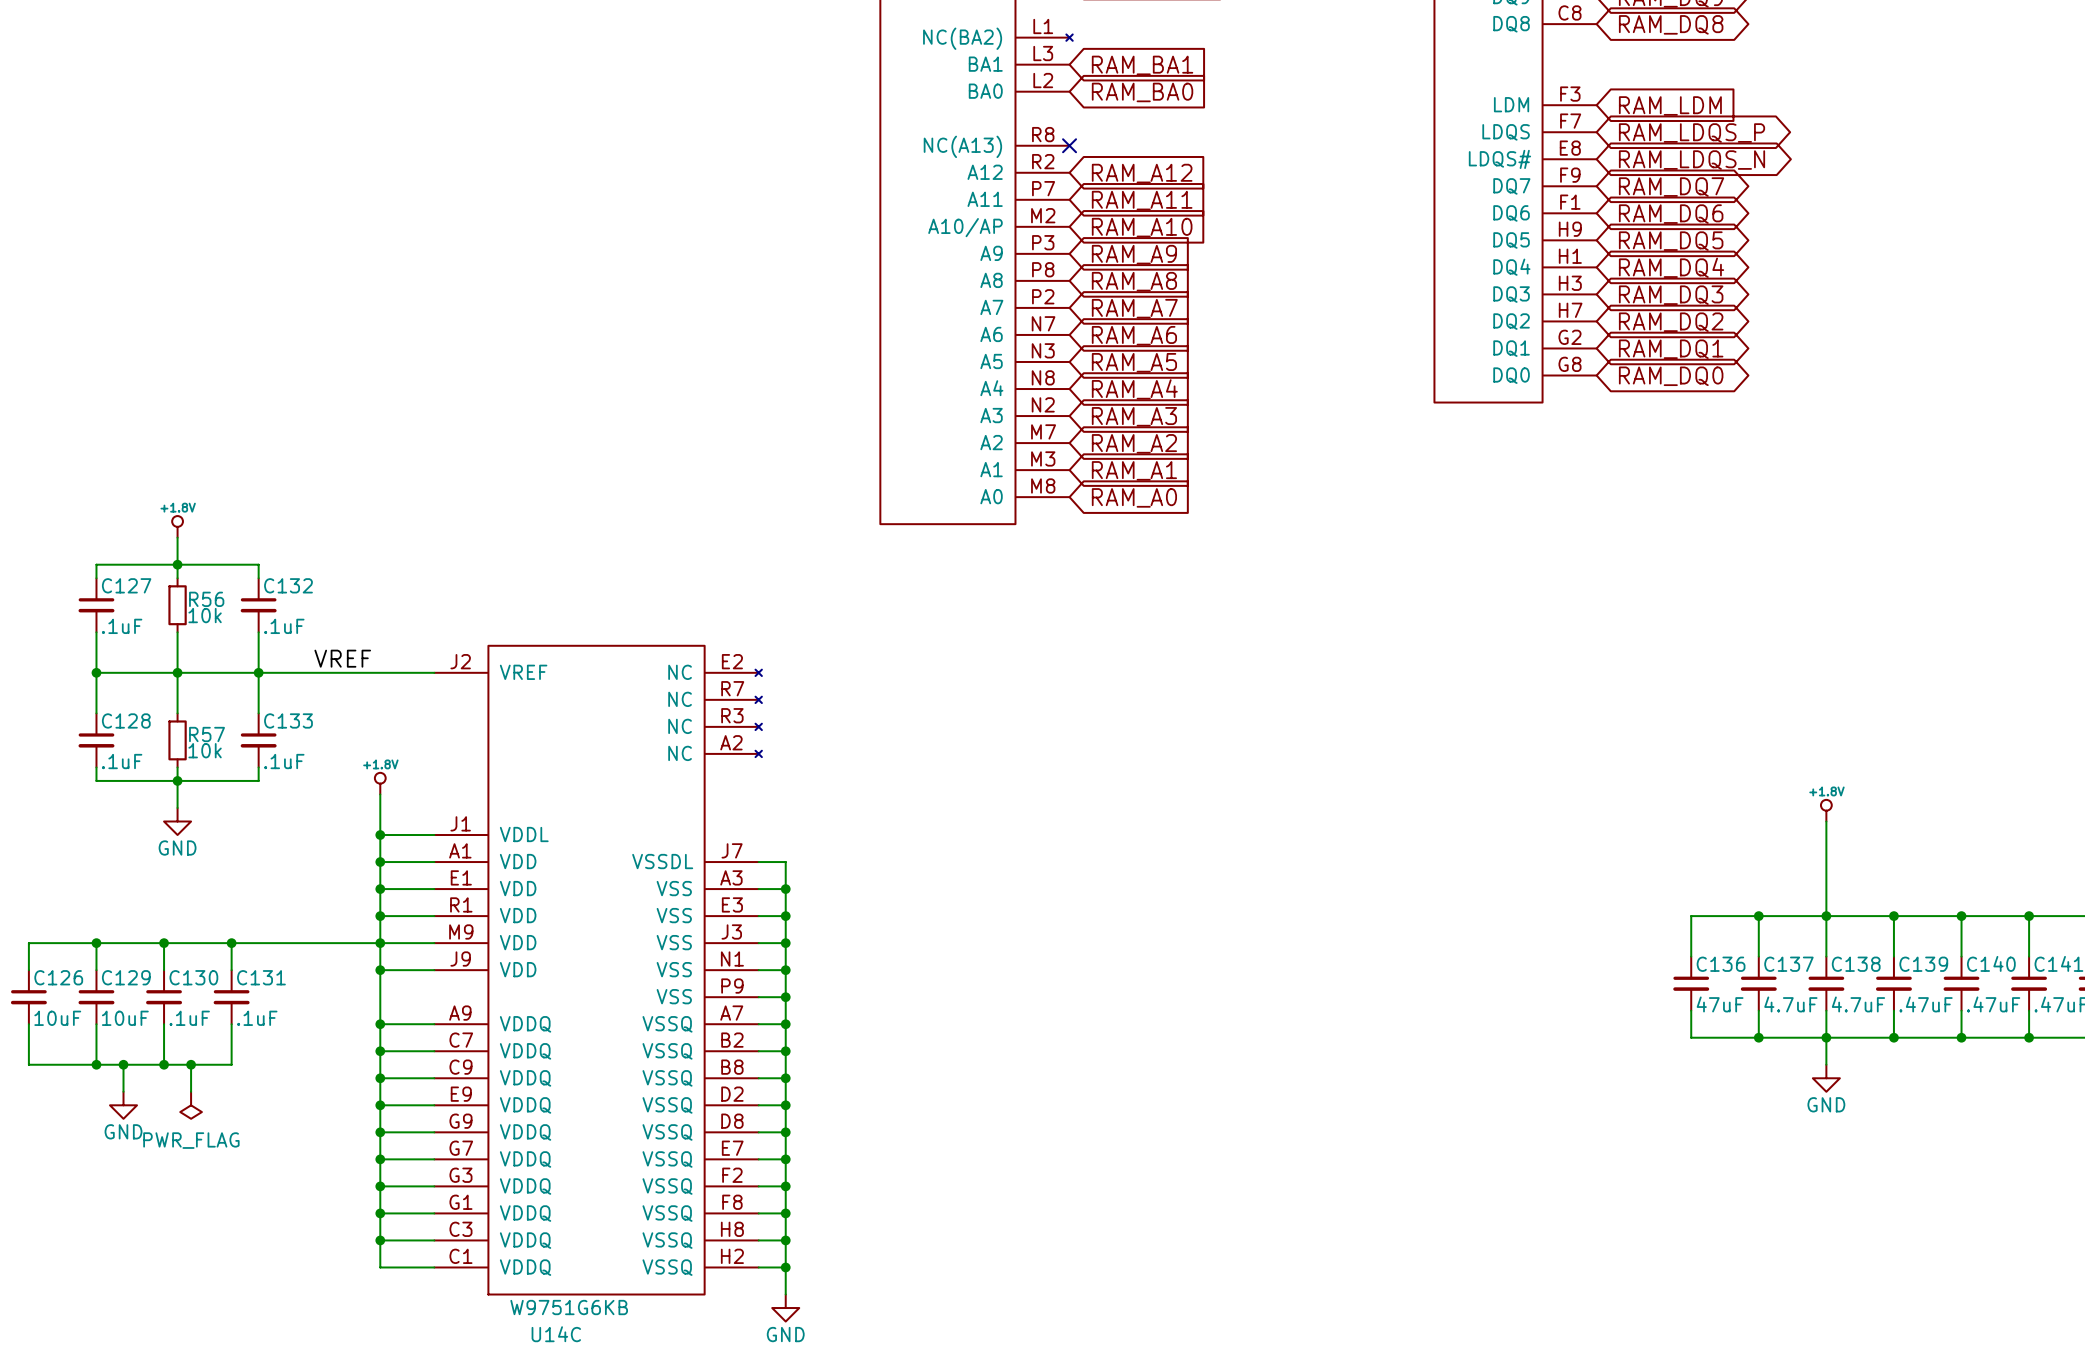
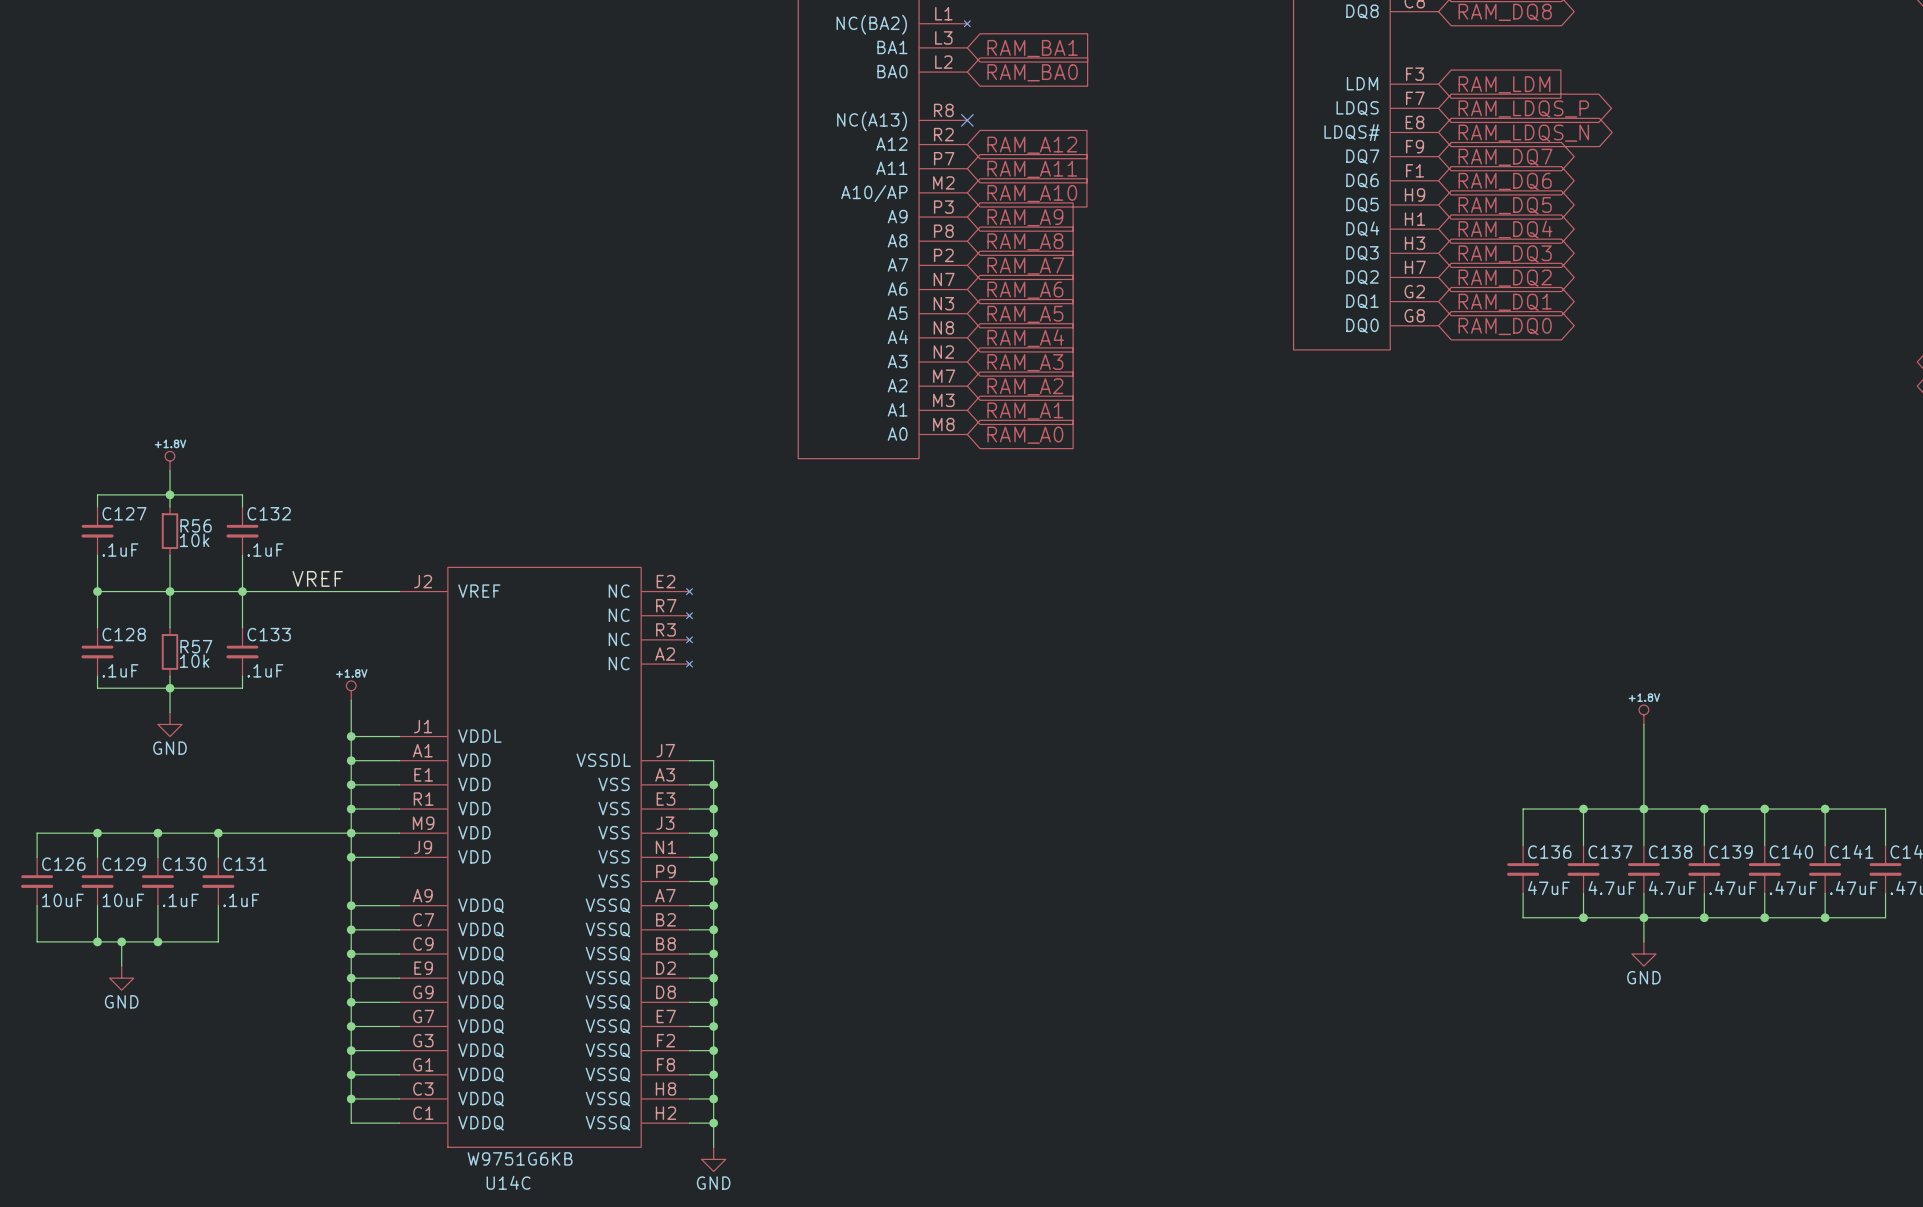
wire: (191, 1064) (191, 1091) -> none
junction: (191, 1064) -> none
power symbol: PWR_FLAG (191, 1105) -> none

